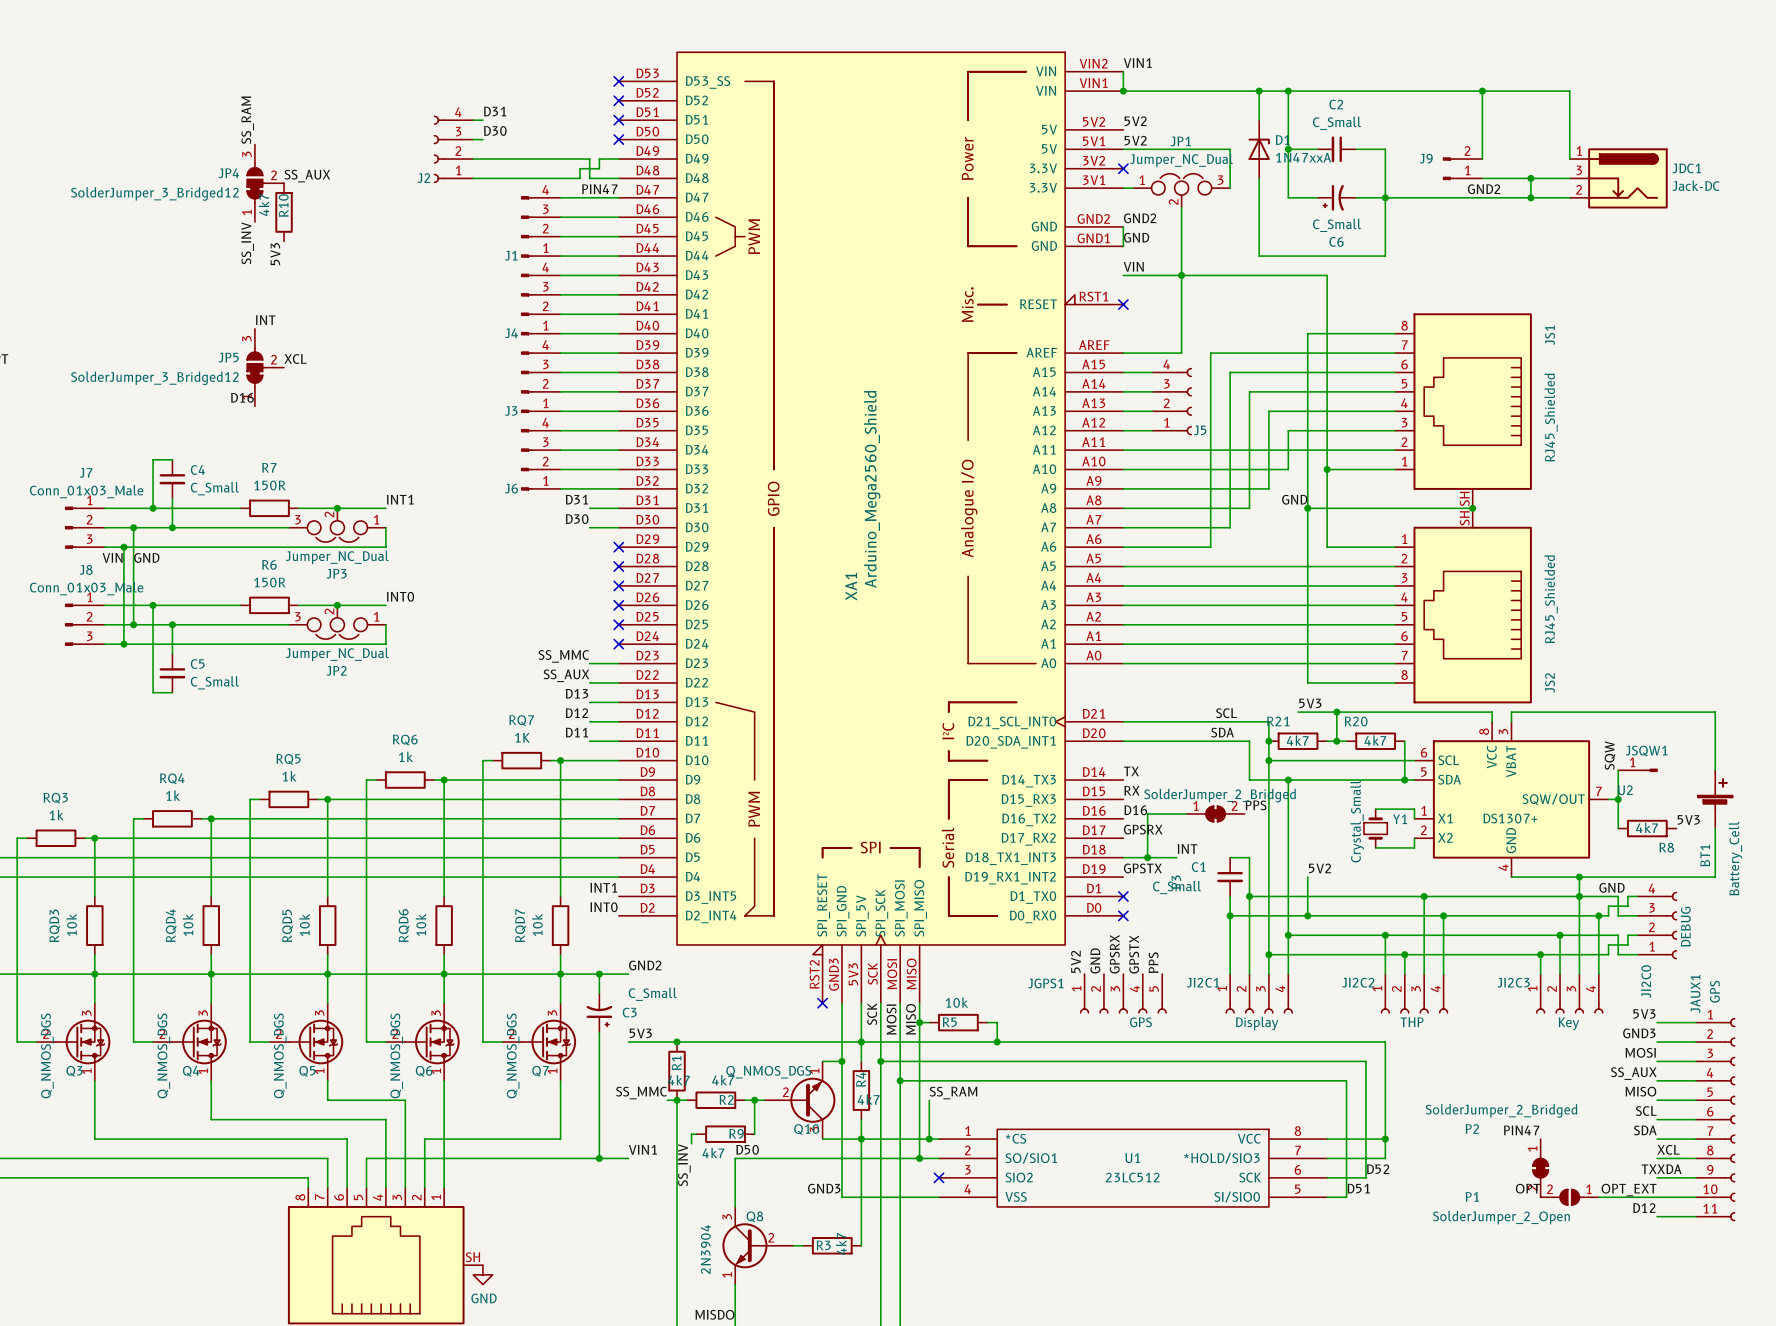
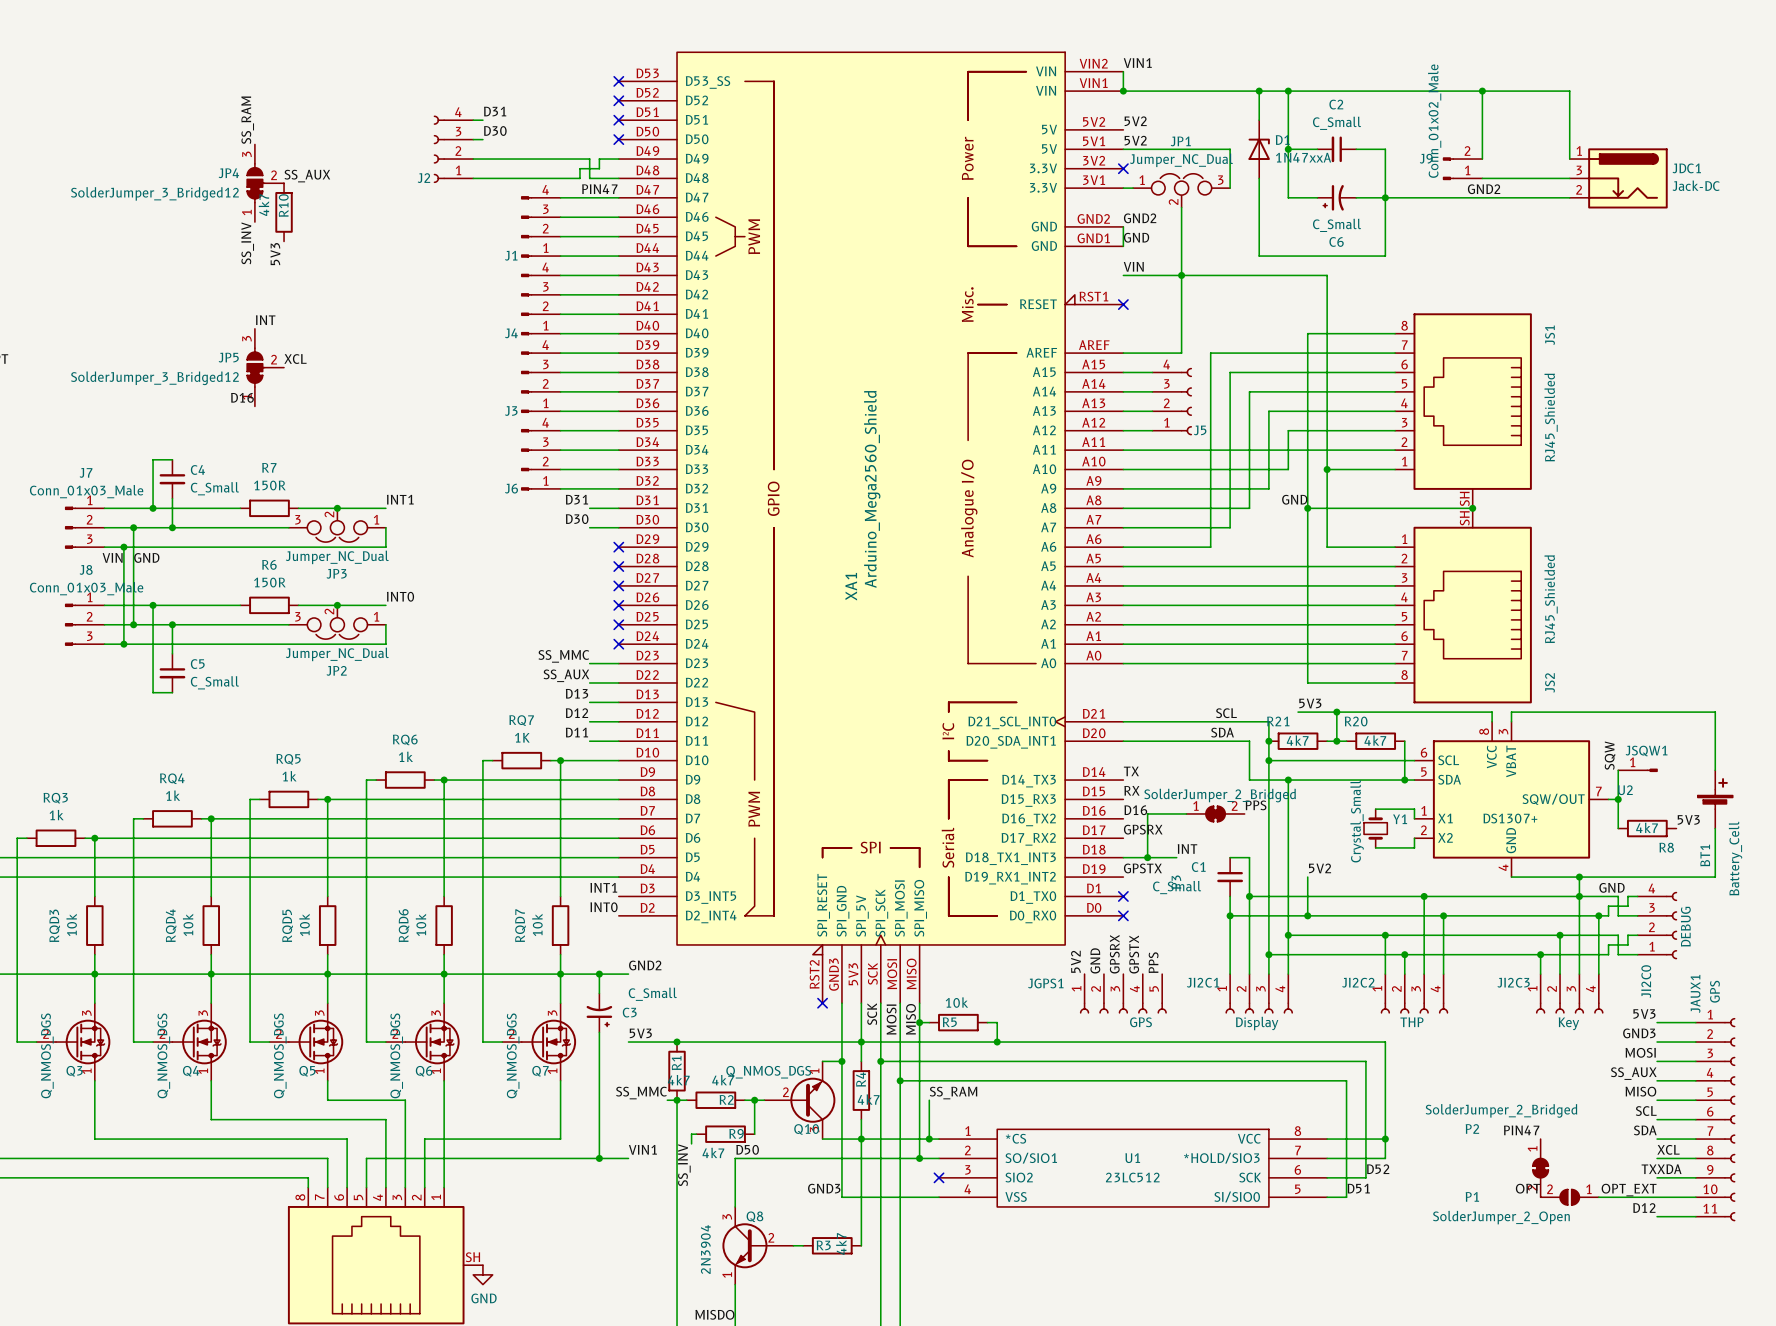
J9 value: none -> Conn_01x02_Male (1434, 121)
wire: (1530, 178) (1530, 197) -> none
junction: (1530, 178) -> none
junction: (1530, 197) -> none

